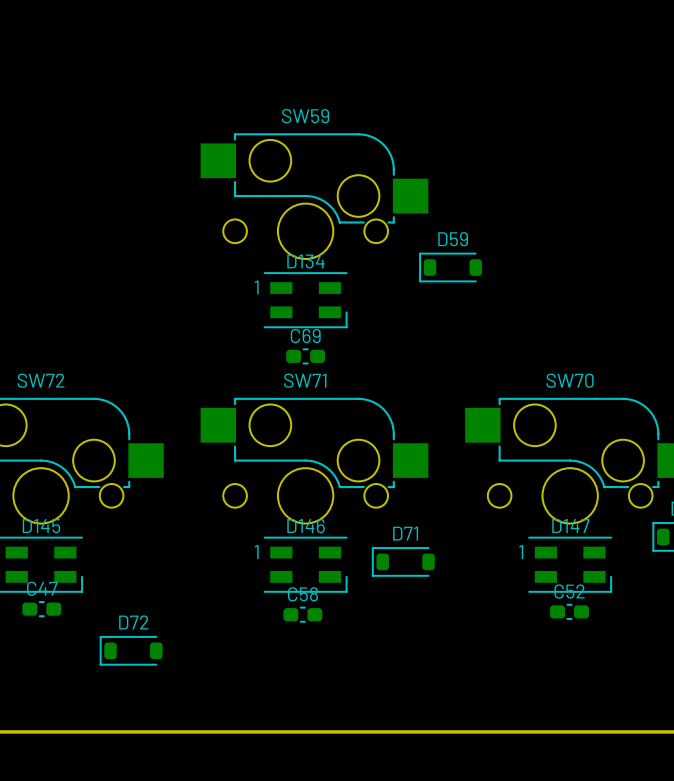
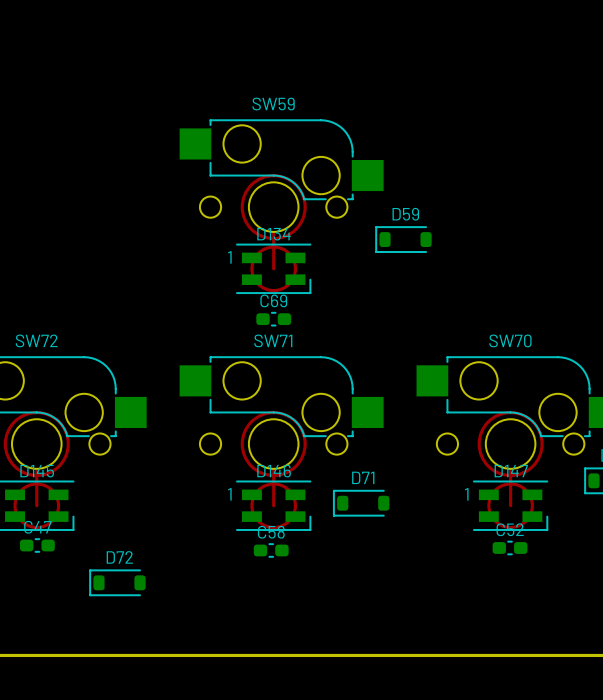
drawing: none -> [240, 174, 307, 293]
top track: none -> (273, 207) (273, 268)
drawing: none -> [3, 411, 70, 530]
drawing: none -> [240, 411, 307, 530]
drawing: none -> [477, 411, 544, 530]
top track: none -> (36, 444) (36, 505)
top track: none -> (273, 444) (273, 505)
top track: none -> (510, 444) (510, 505)

